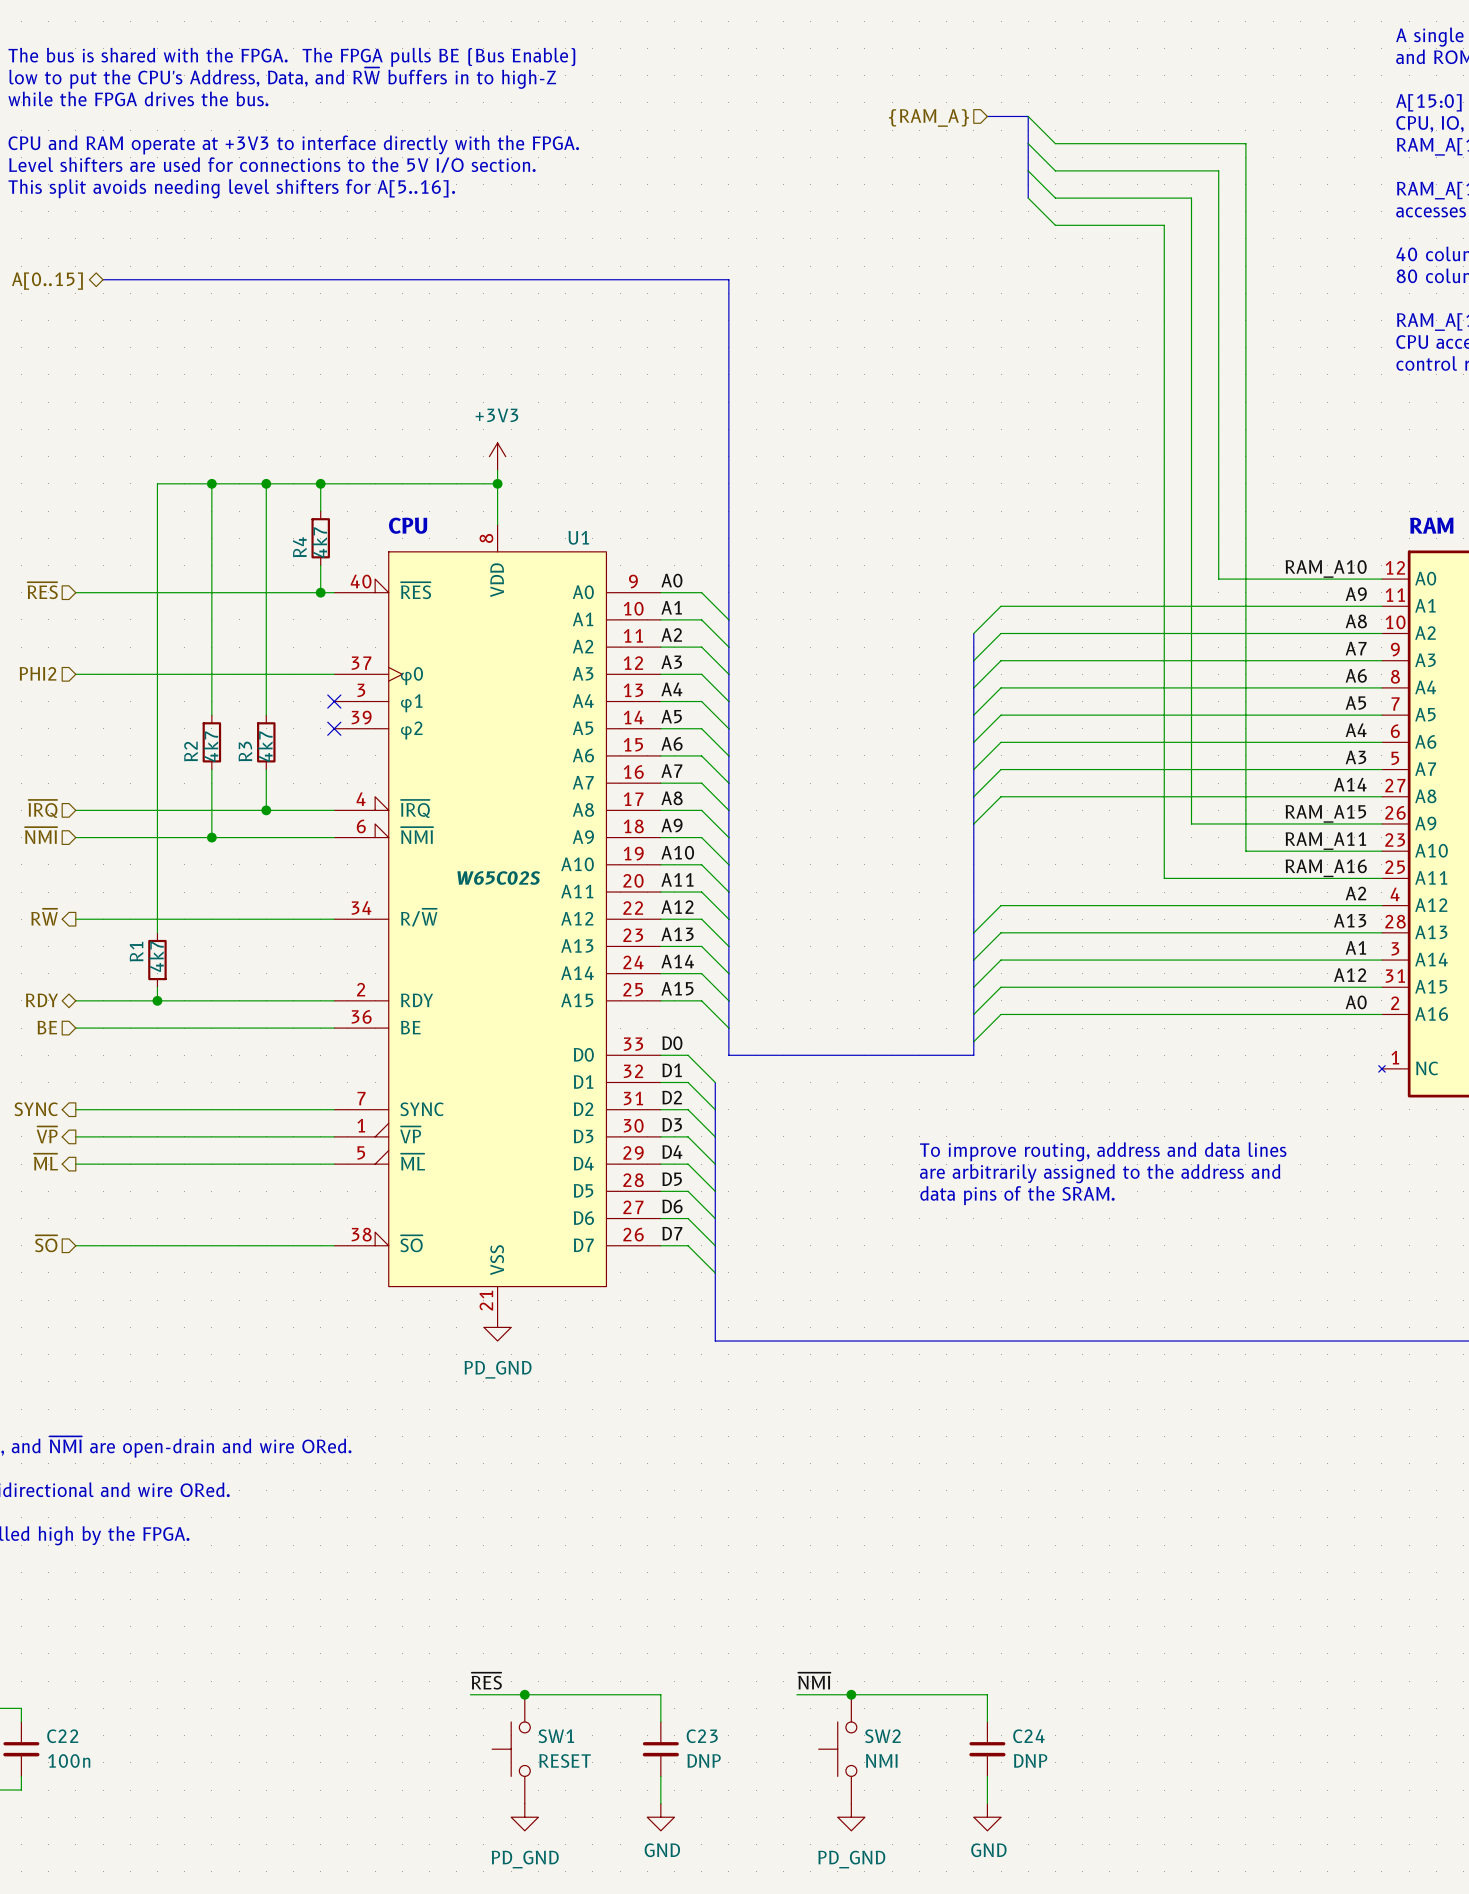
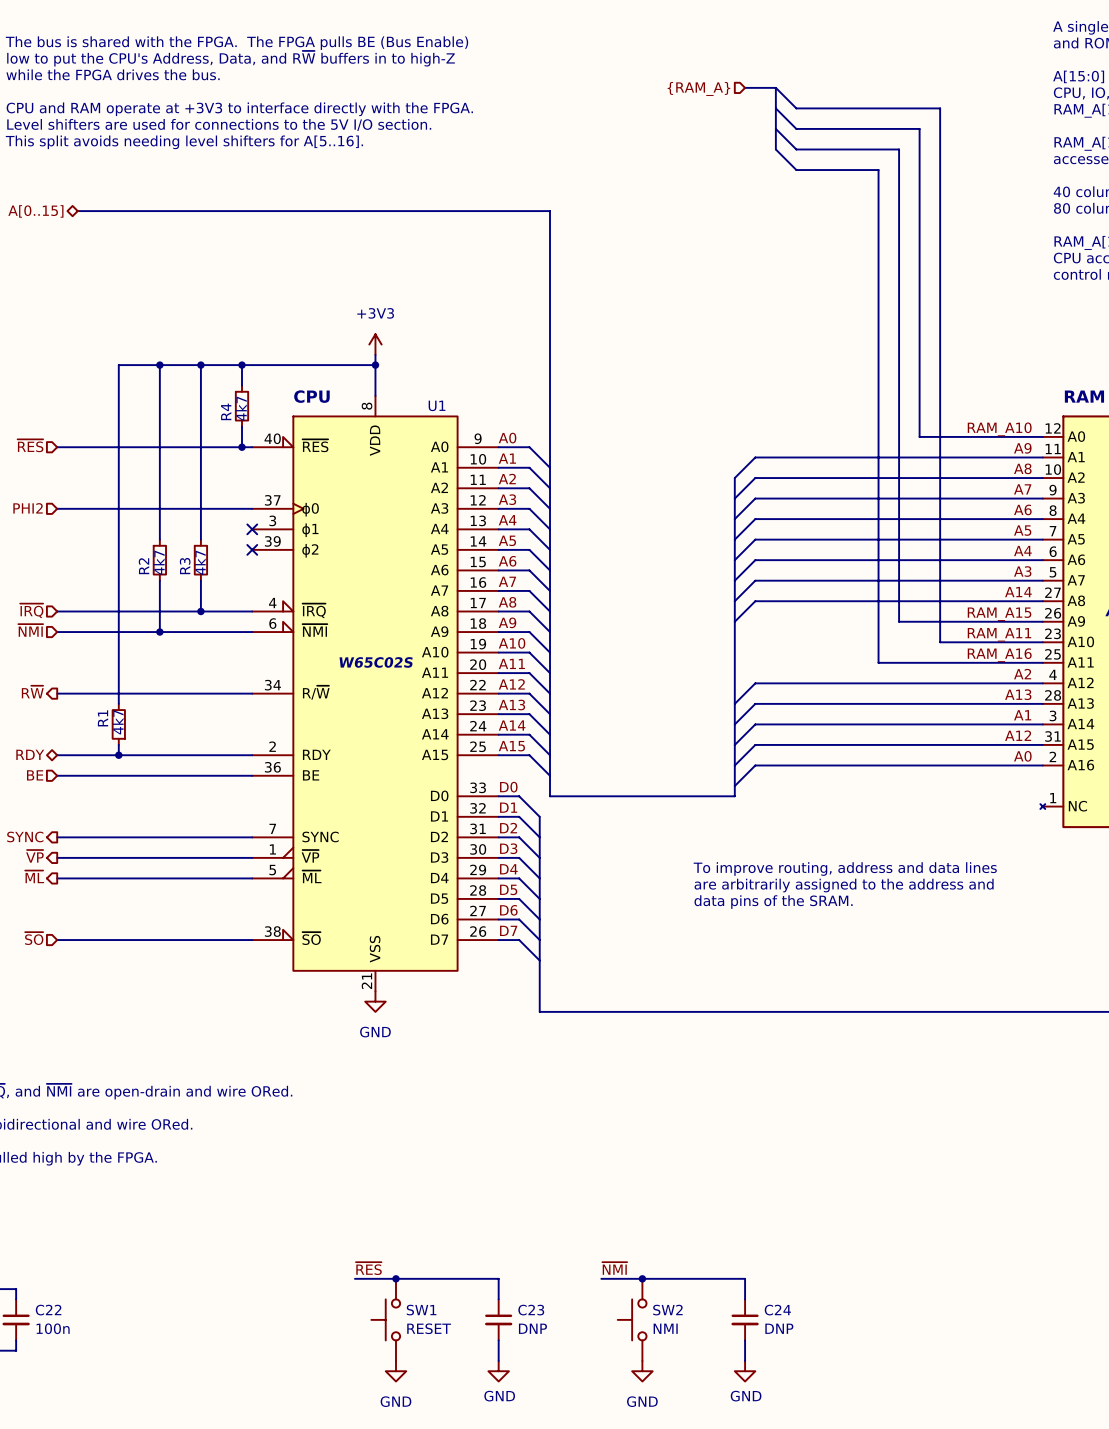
power symbol: PD_GND (497, 1327) -> GND (375, 1001)
power symbol: PD_GND (524, 1817) -> GND (396, 1371)
power symbol: PD_GND (851, 1817) -> GND (642, 1371)

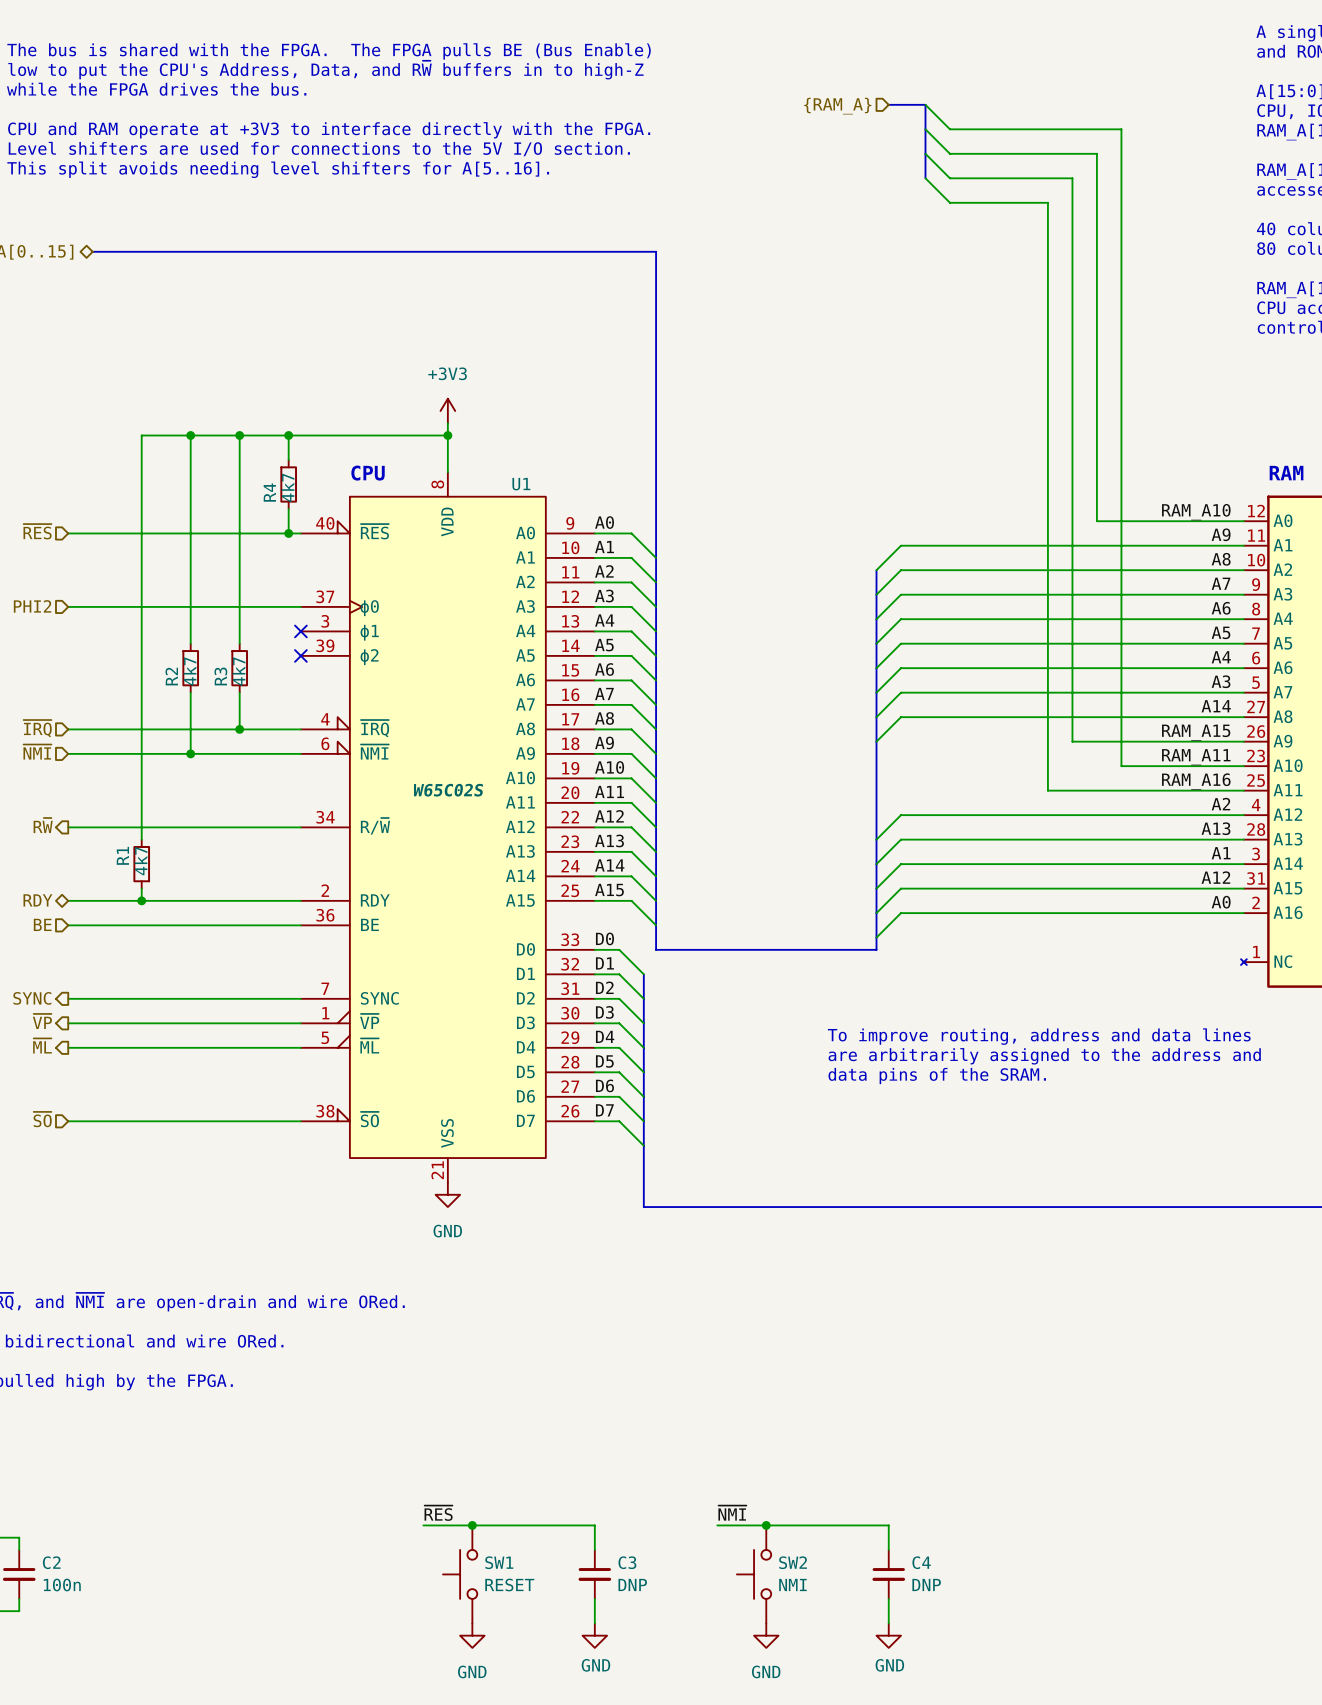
C22 name: C22 (48, 1310) -> C2 (51, 1562)
C23 name: C23 (531, 1310) -> C3 (627, 1562)
C24 name: C24 (777, 1310) -> C4 (921, 1562)

